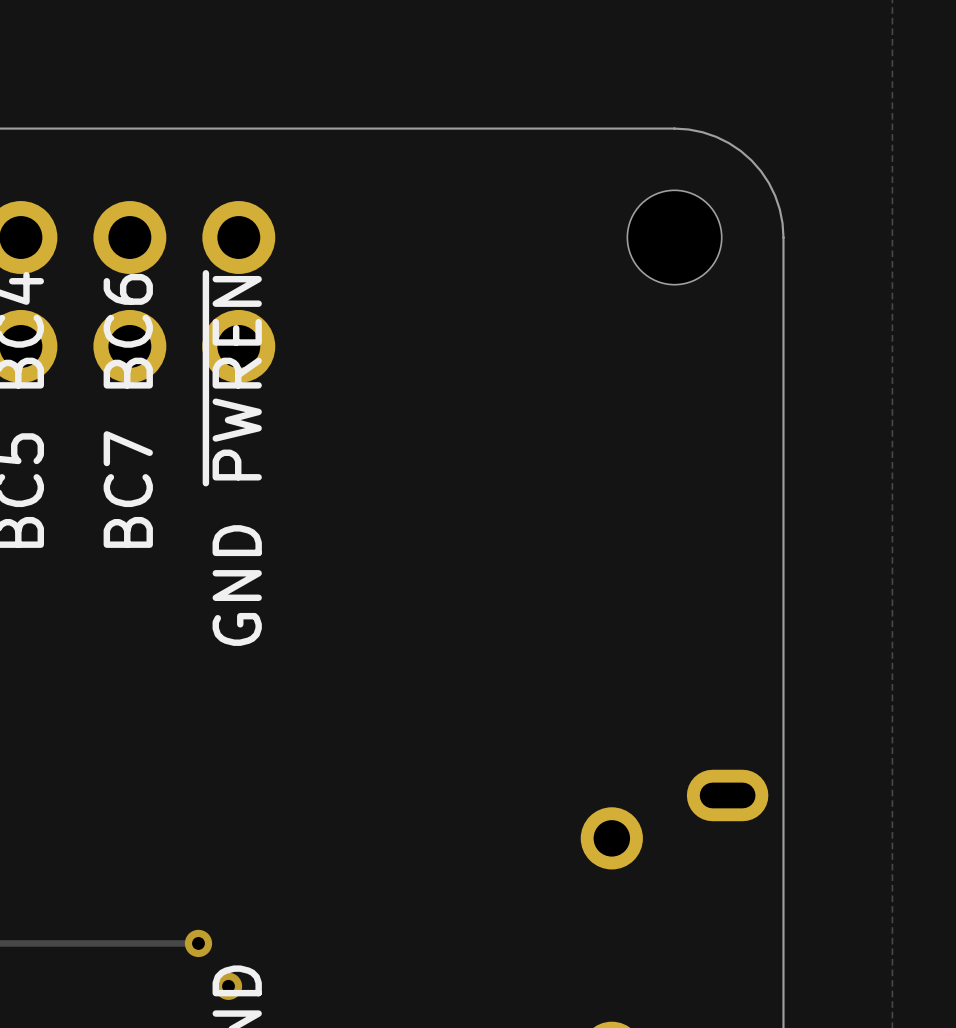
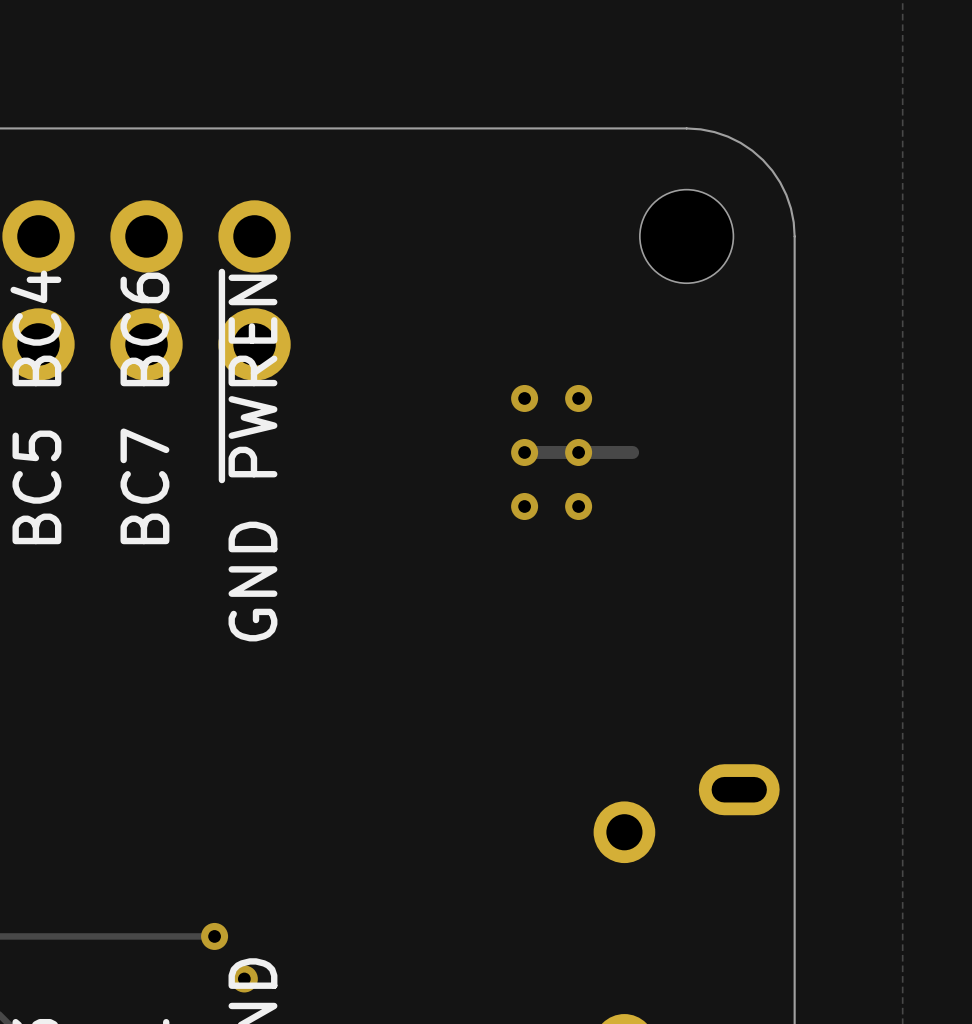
via: none -> (524, 398)
via: none -> (578, 398)
via: none -> (524, 452)
via: none -> (578, 452)
track: none -> (632, 452) (524, 452)
via: none -> (524, 506)
via: none -> (578, 506)

